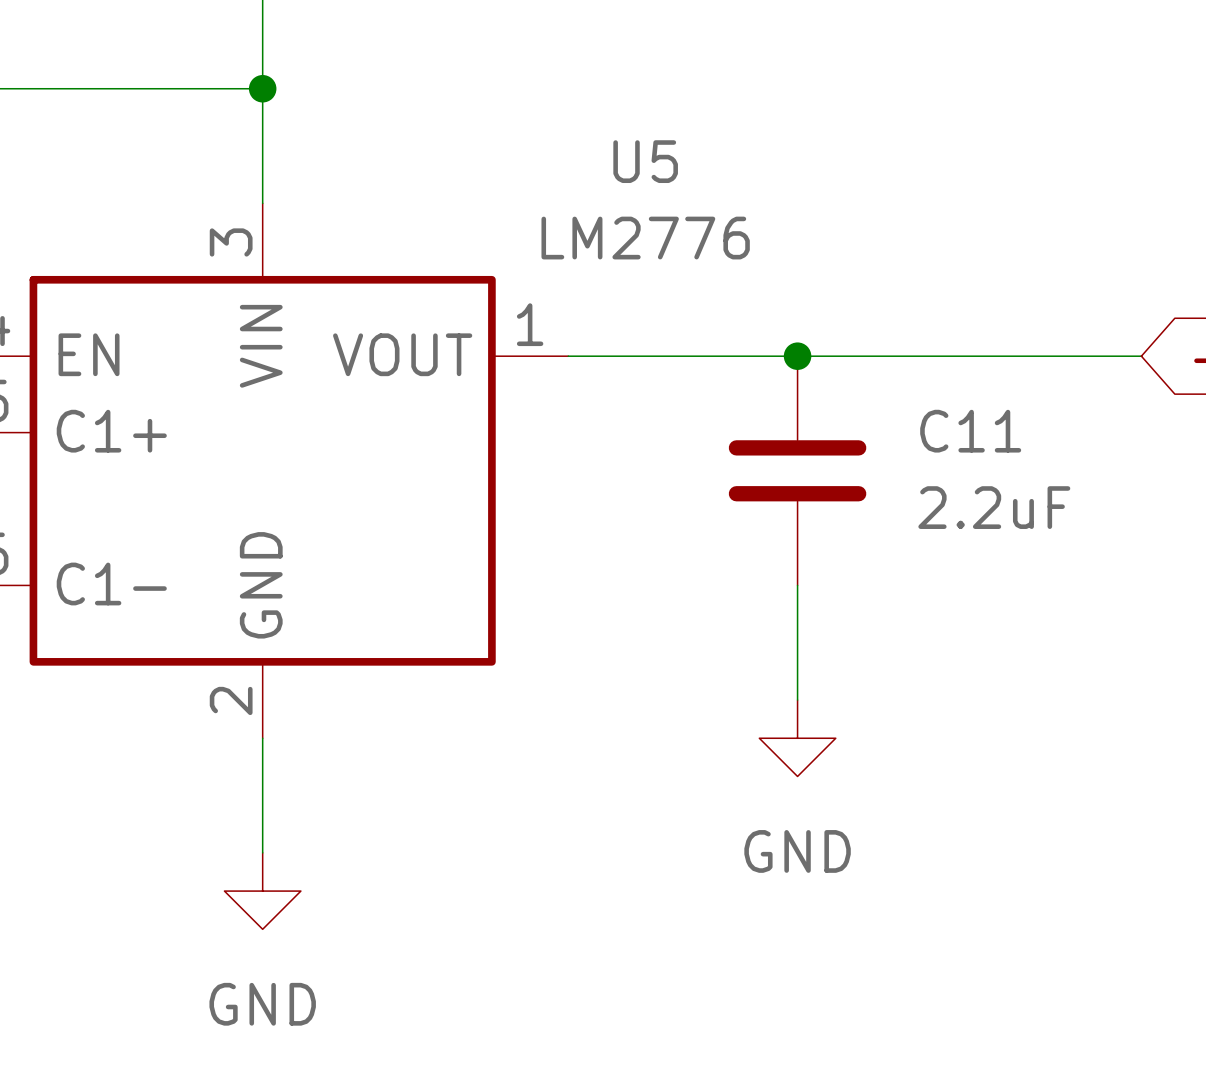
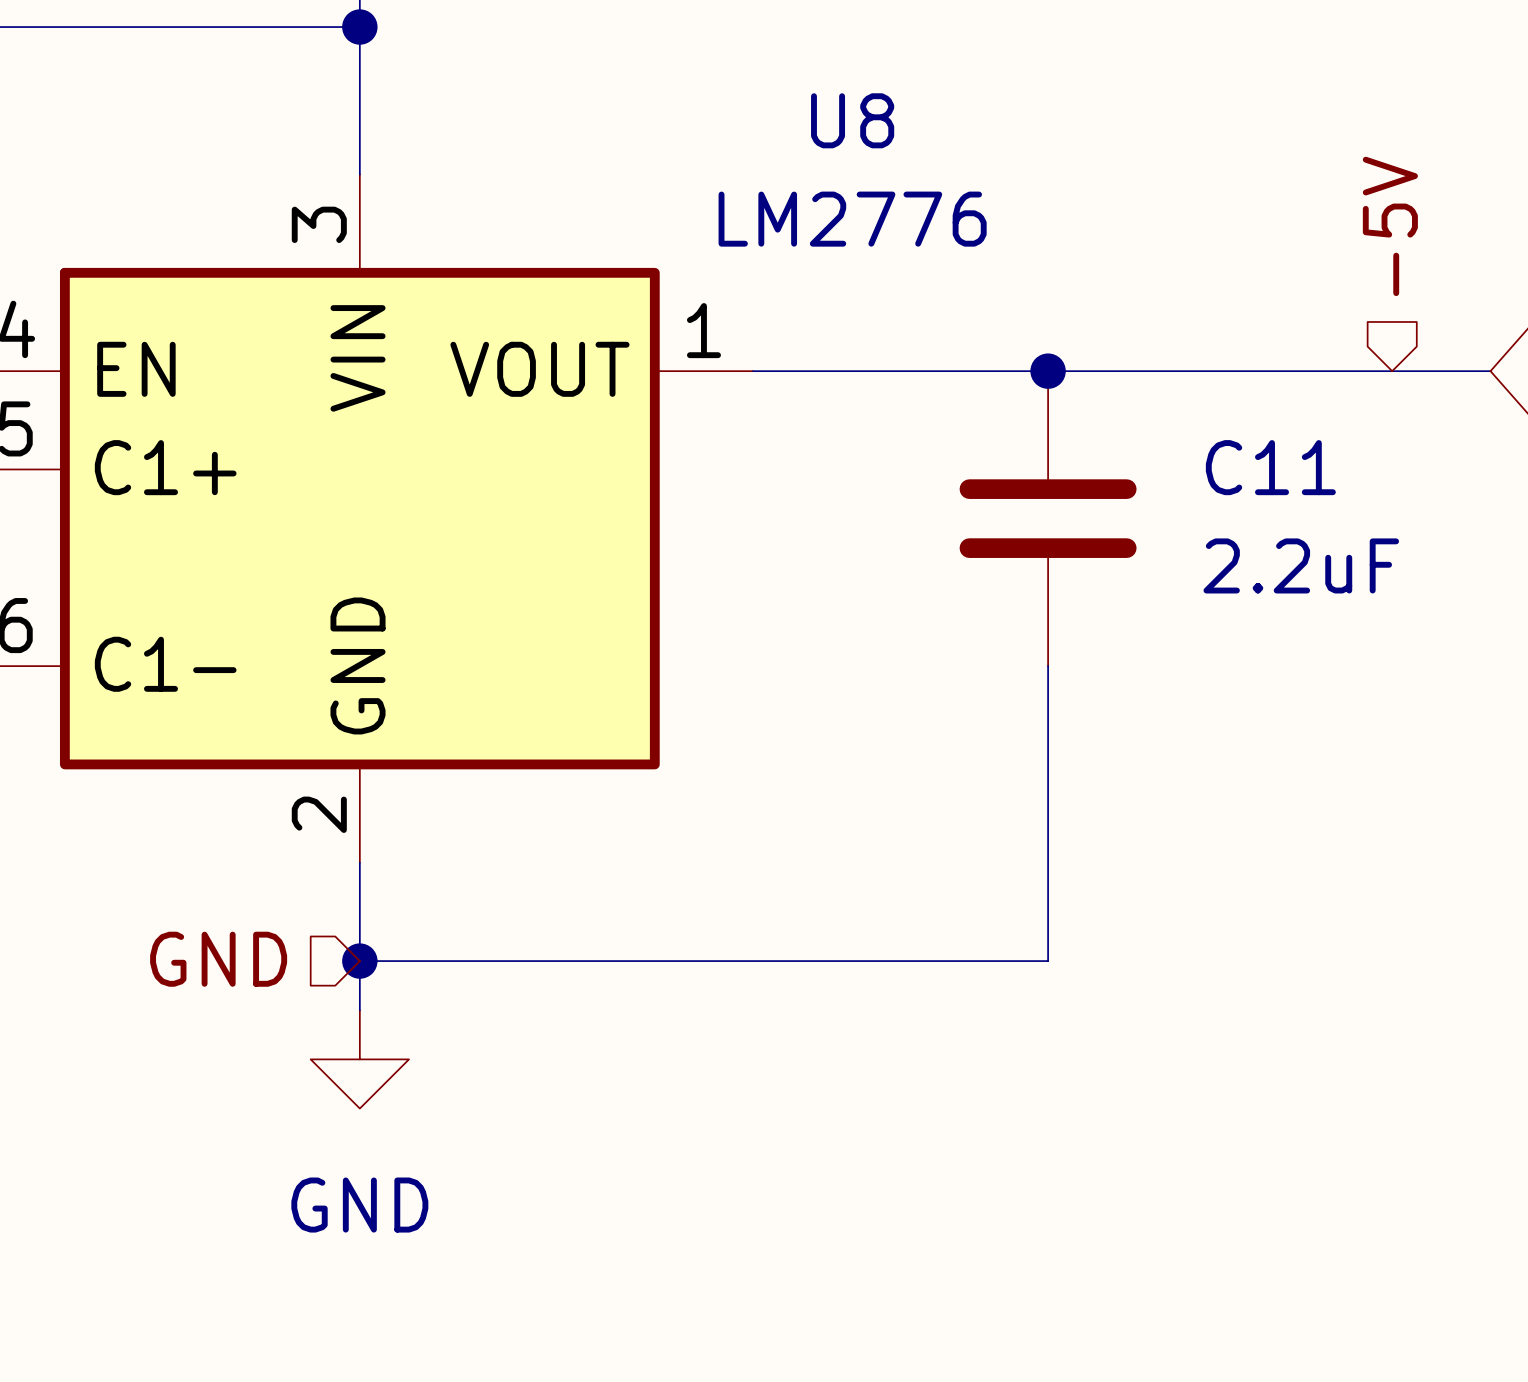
U5 name: U5 (645, 161) -> U8 (852, 120)
hierarchical label: none -> -5V (1390, 226)
wire: none -> (1048, 813) (1048, 961) (359, 961)
power symbol: GND (797, 738) -> none
hierarchical label: none -> GND (218, 959)
junction: none -> (359, 961)

